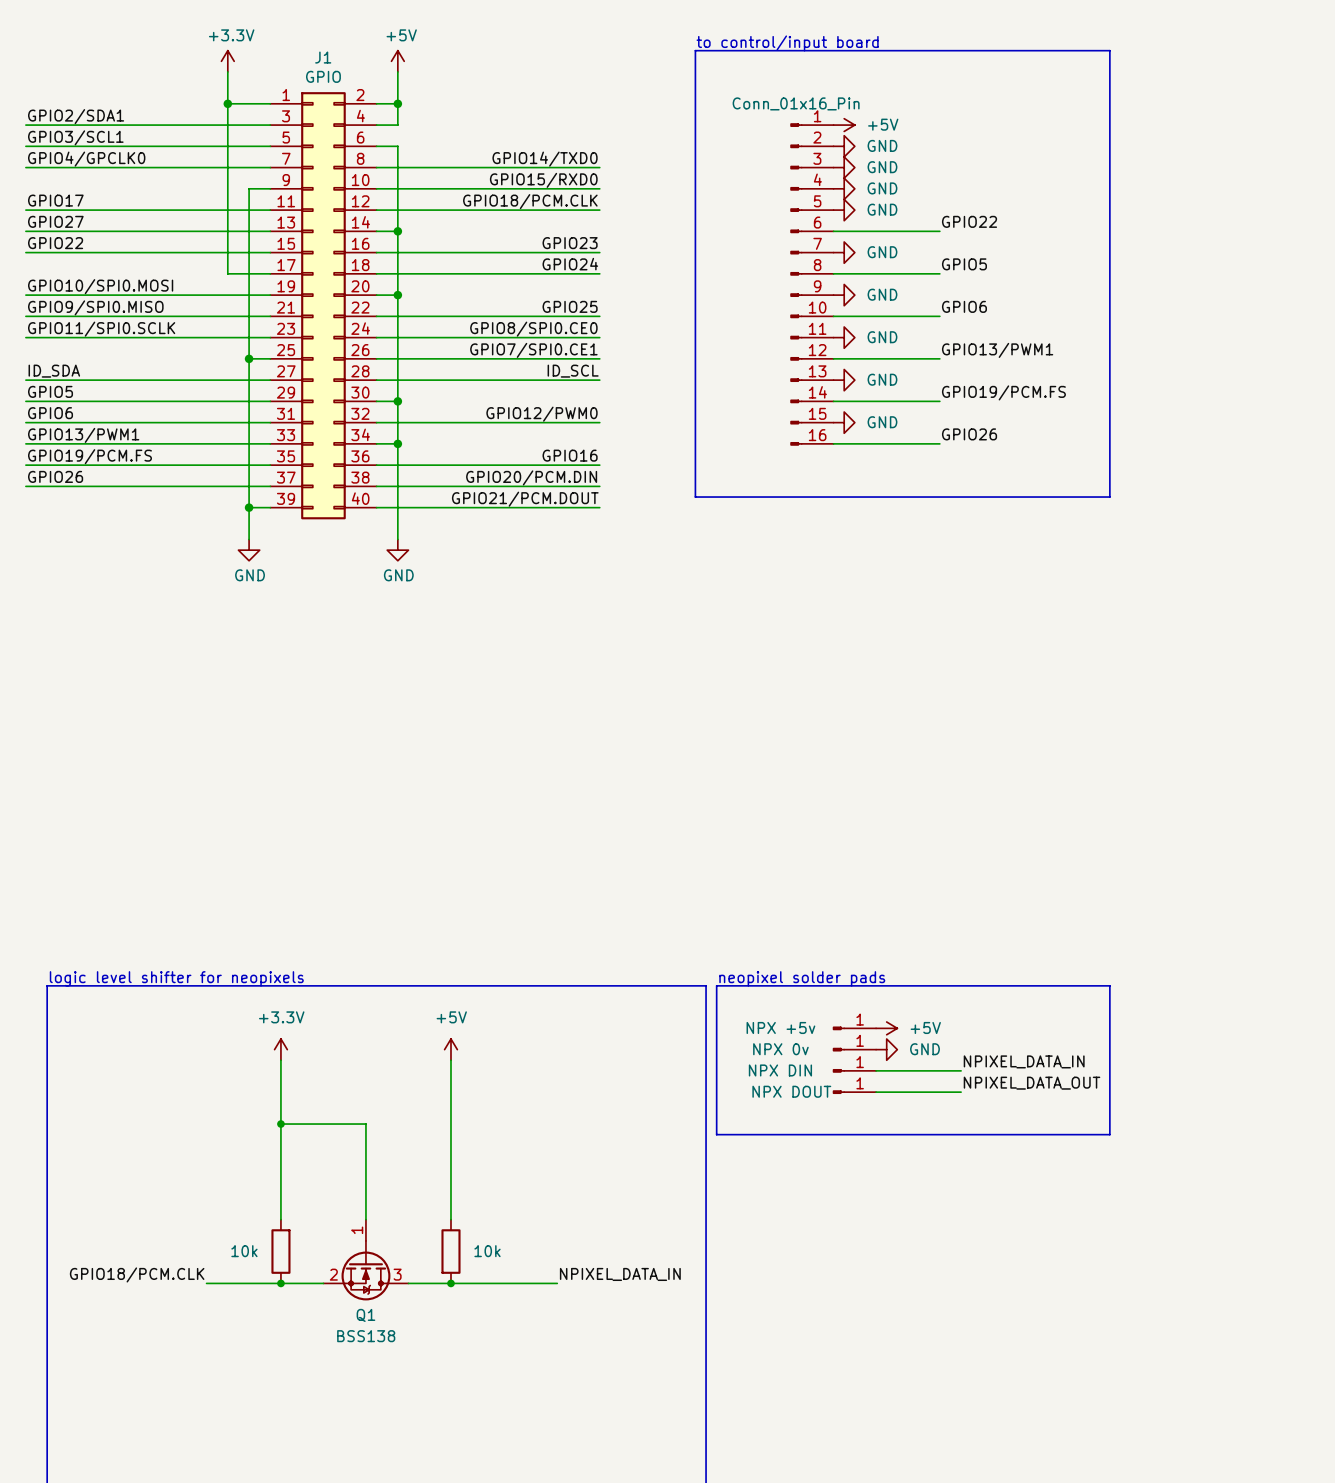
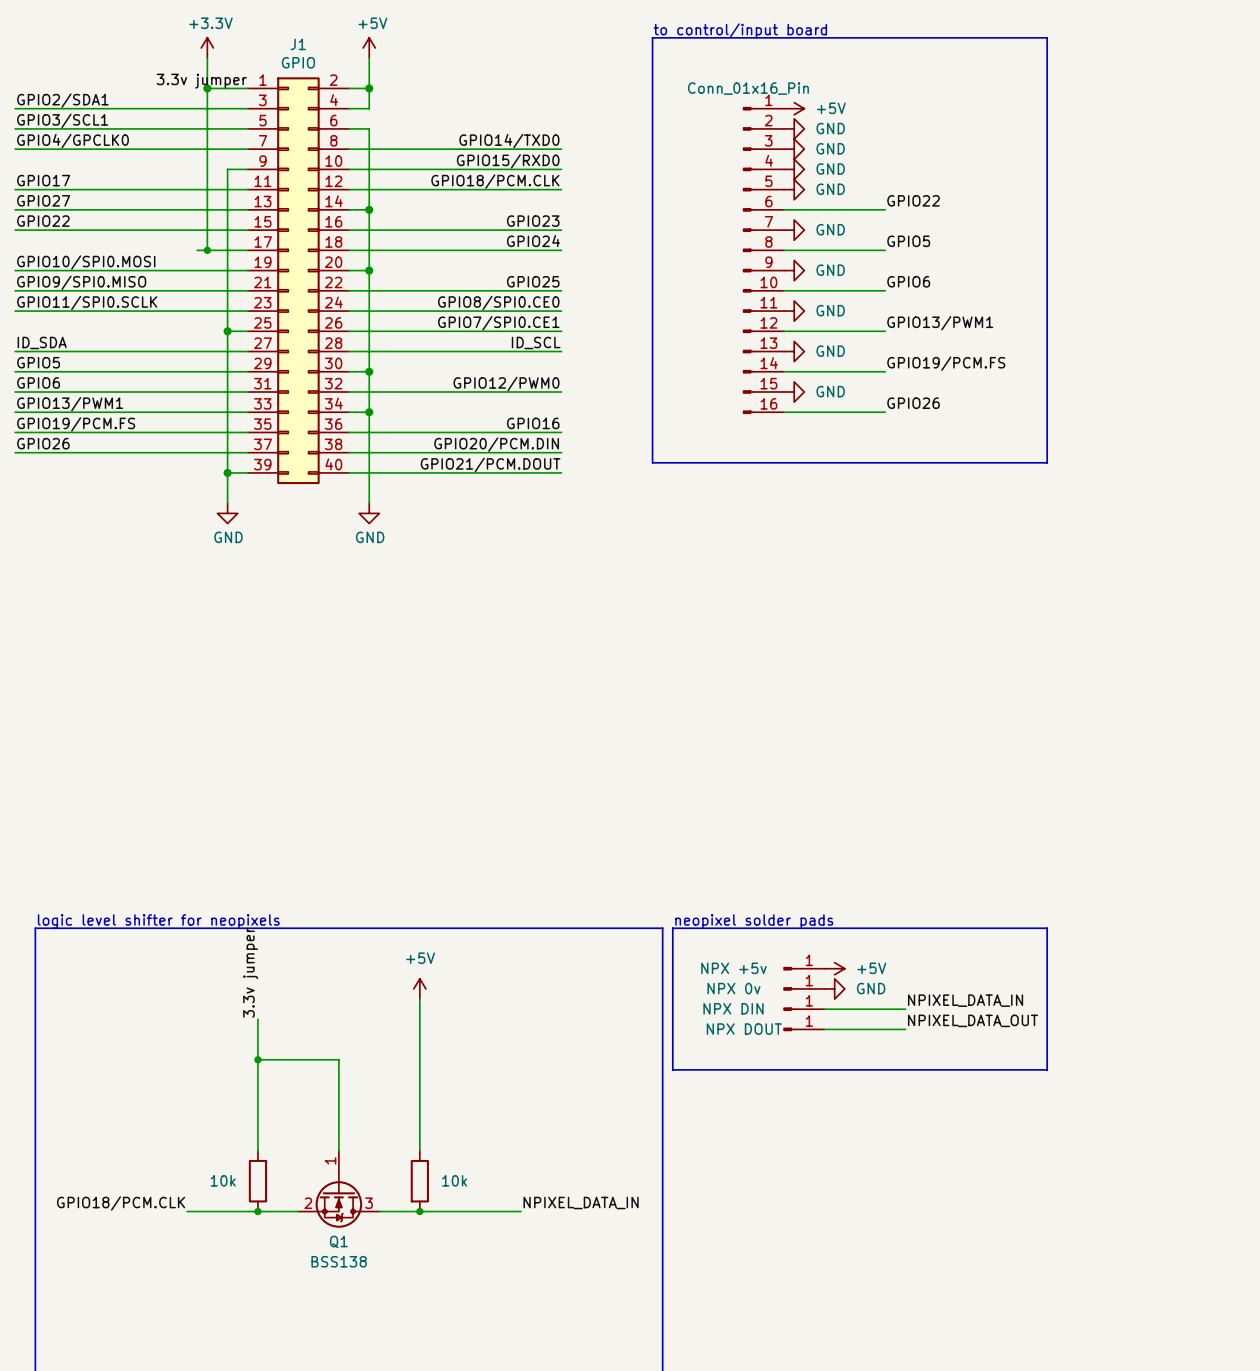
label: none -> 3.3v jumper (201, 81)
wire: none -> (197, 250) (207, 250)
junction: none -> (207, 250)
label: none -> 3.3v jumper (250, 972)
power symbol: +3.3V (280, 1049) -> none
wire: (280, 1060) (280, 1081) -> none

